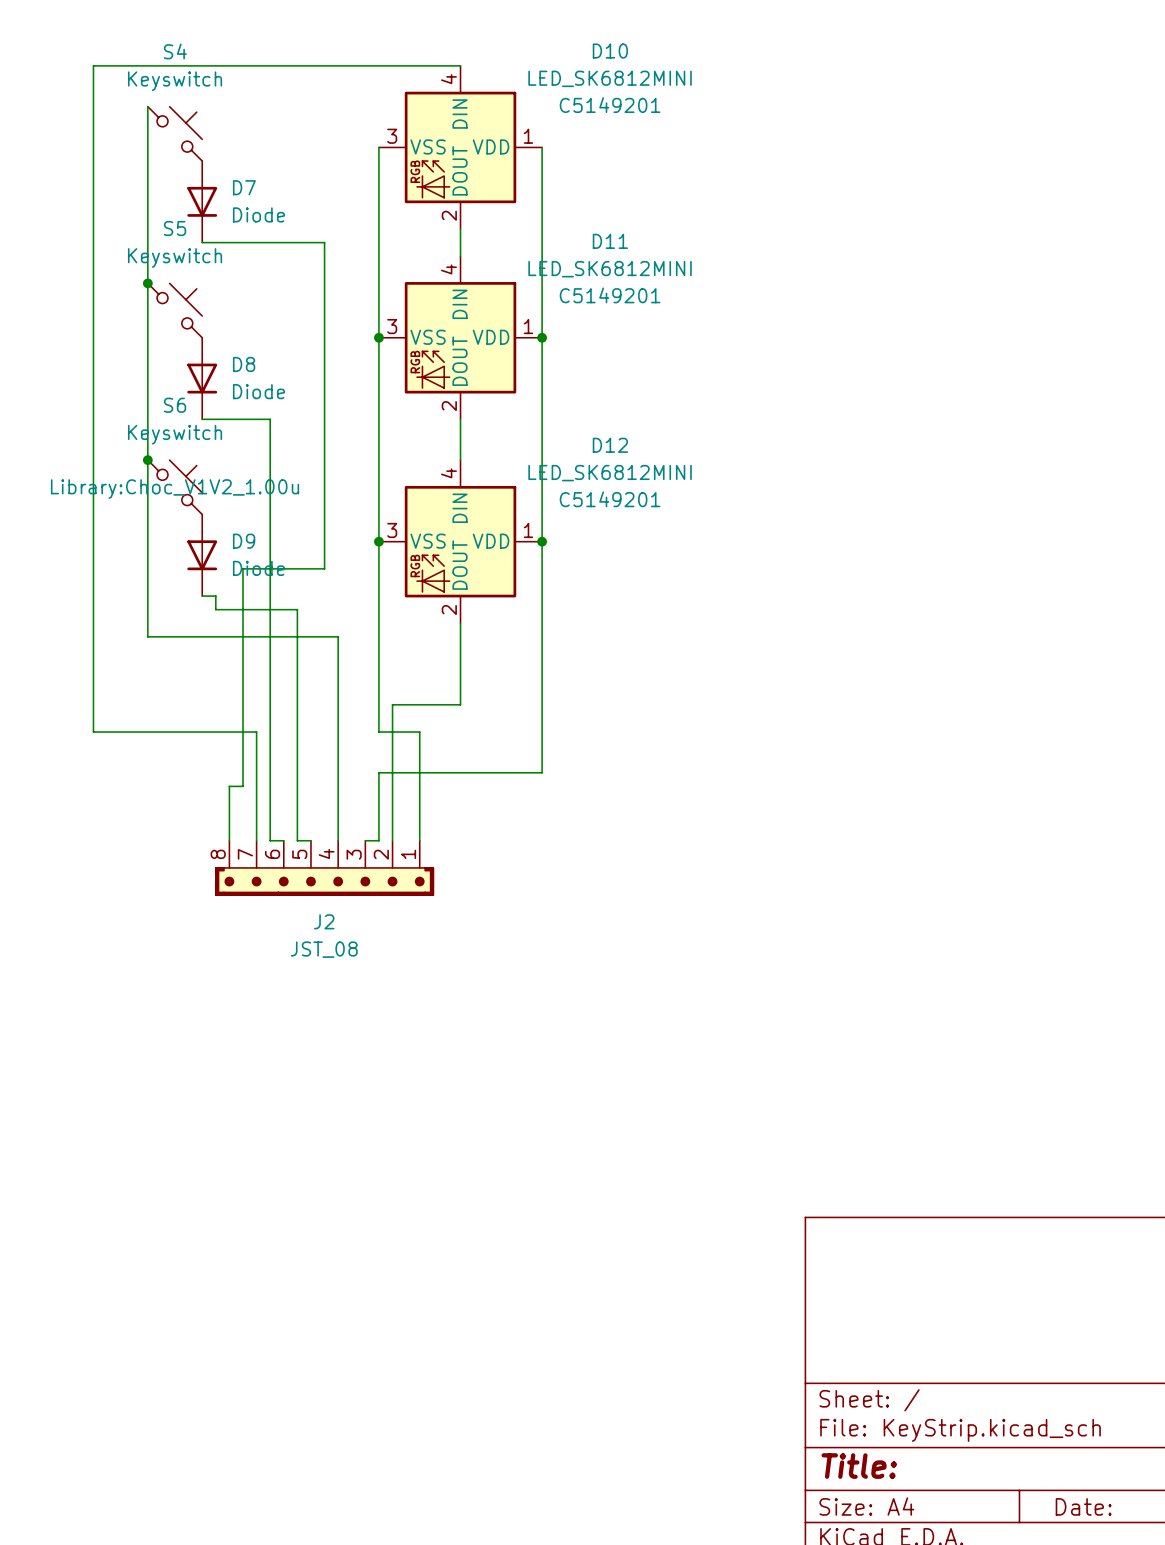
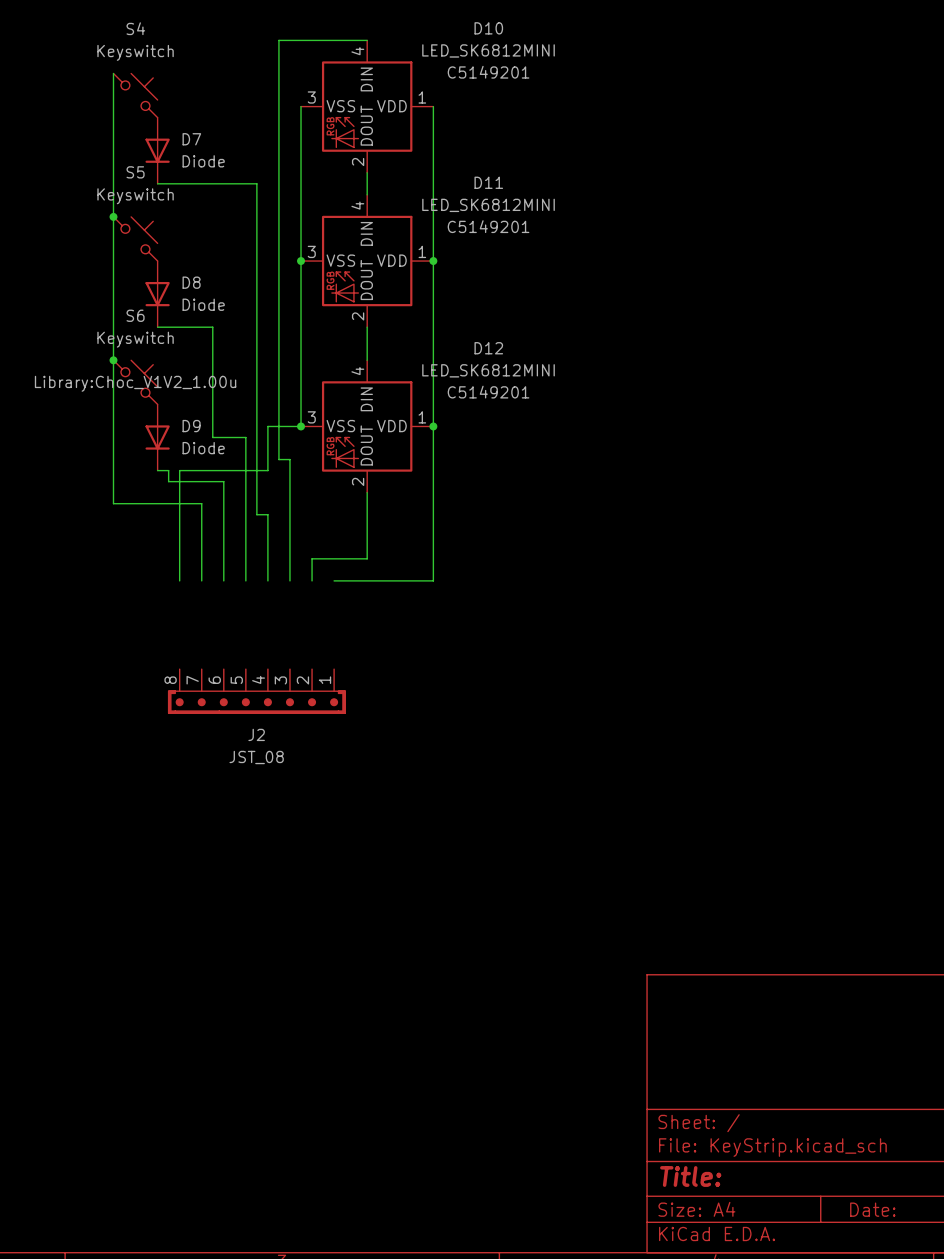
wire: (351, 65) (93, 65) (93, 732) (256, 732) (256, 840) -> (278, 40) (278, 459) (289, 459) (289, 580)
wire: (378, 541) (378, 732) (419, 732) (419, 840) -> (301, 426) (267, 426) (267, 470) (179, 470) (179, 580)
wire: (270, 555) (270, 840) (283, 840) -> (212, 437) (245, 437) (245, 580)
wire: (324, 568) (243, 568) (243, 786) (229, 786) (229, 840) -> none
wire: (283, 609) (297, 609) (297, 840) (310, 840) -> (223, 481) (223, 580)
wire: (256, 636) (338, 636) (338, 650) -> (256, 448) (256, 514) (267, 514)
wire: none -> (201, 503) (201, 580)
wire: (338, 732) (338, 840) -> none
wire: (392, 732) (392, 840) -> none
wire: (542, 732) (542, 772) (378, 772) (378, 840) (365, 840) -> (433, 580) (334, 580)

